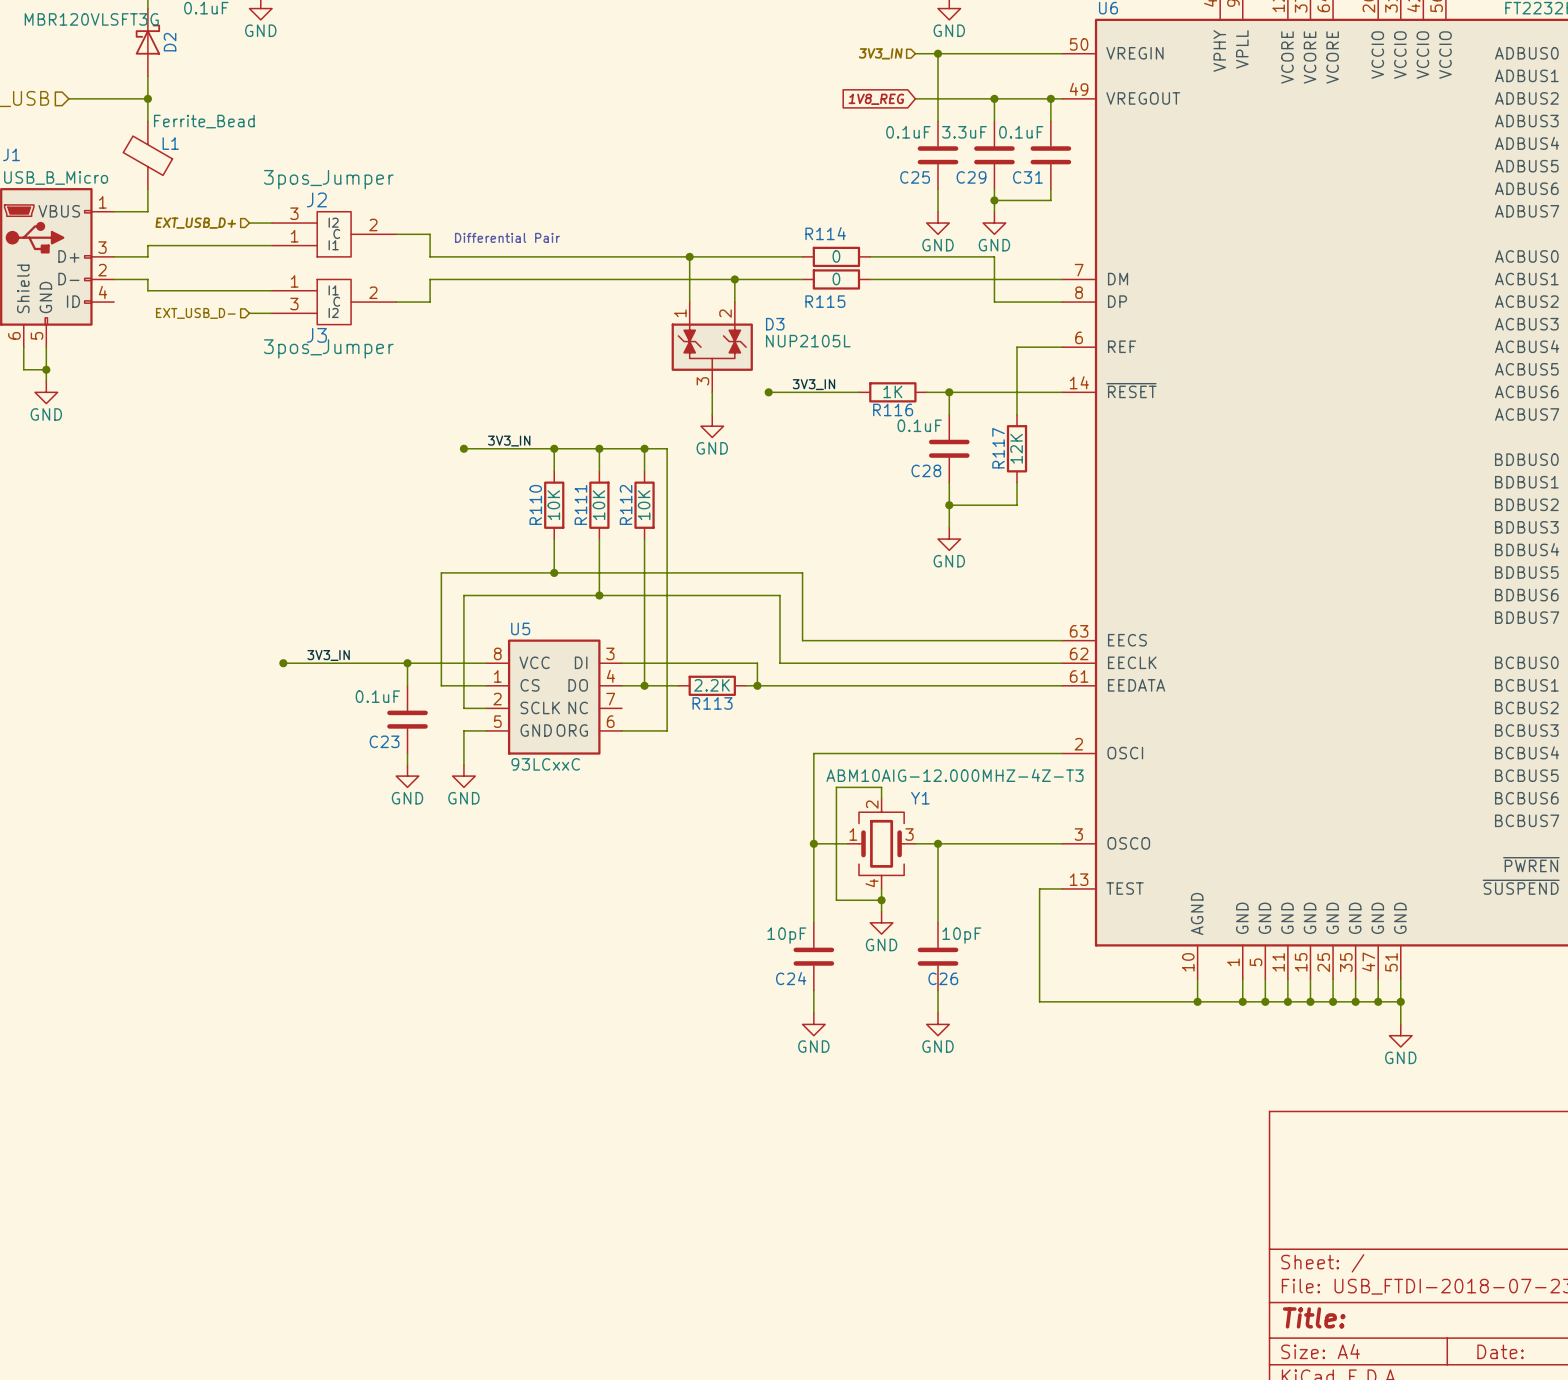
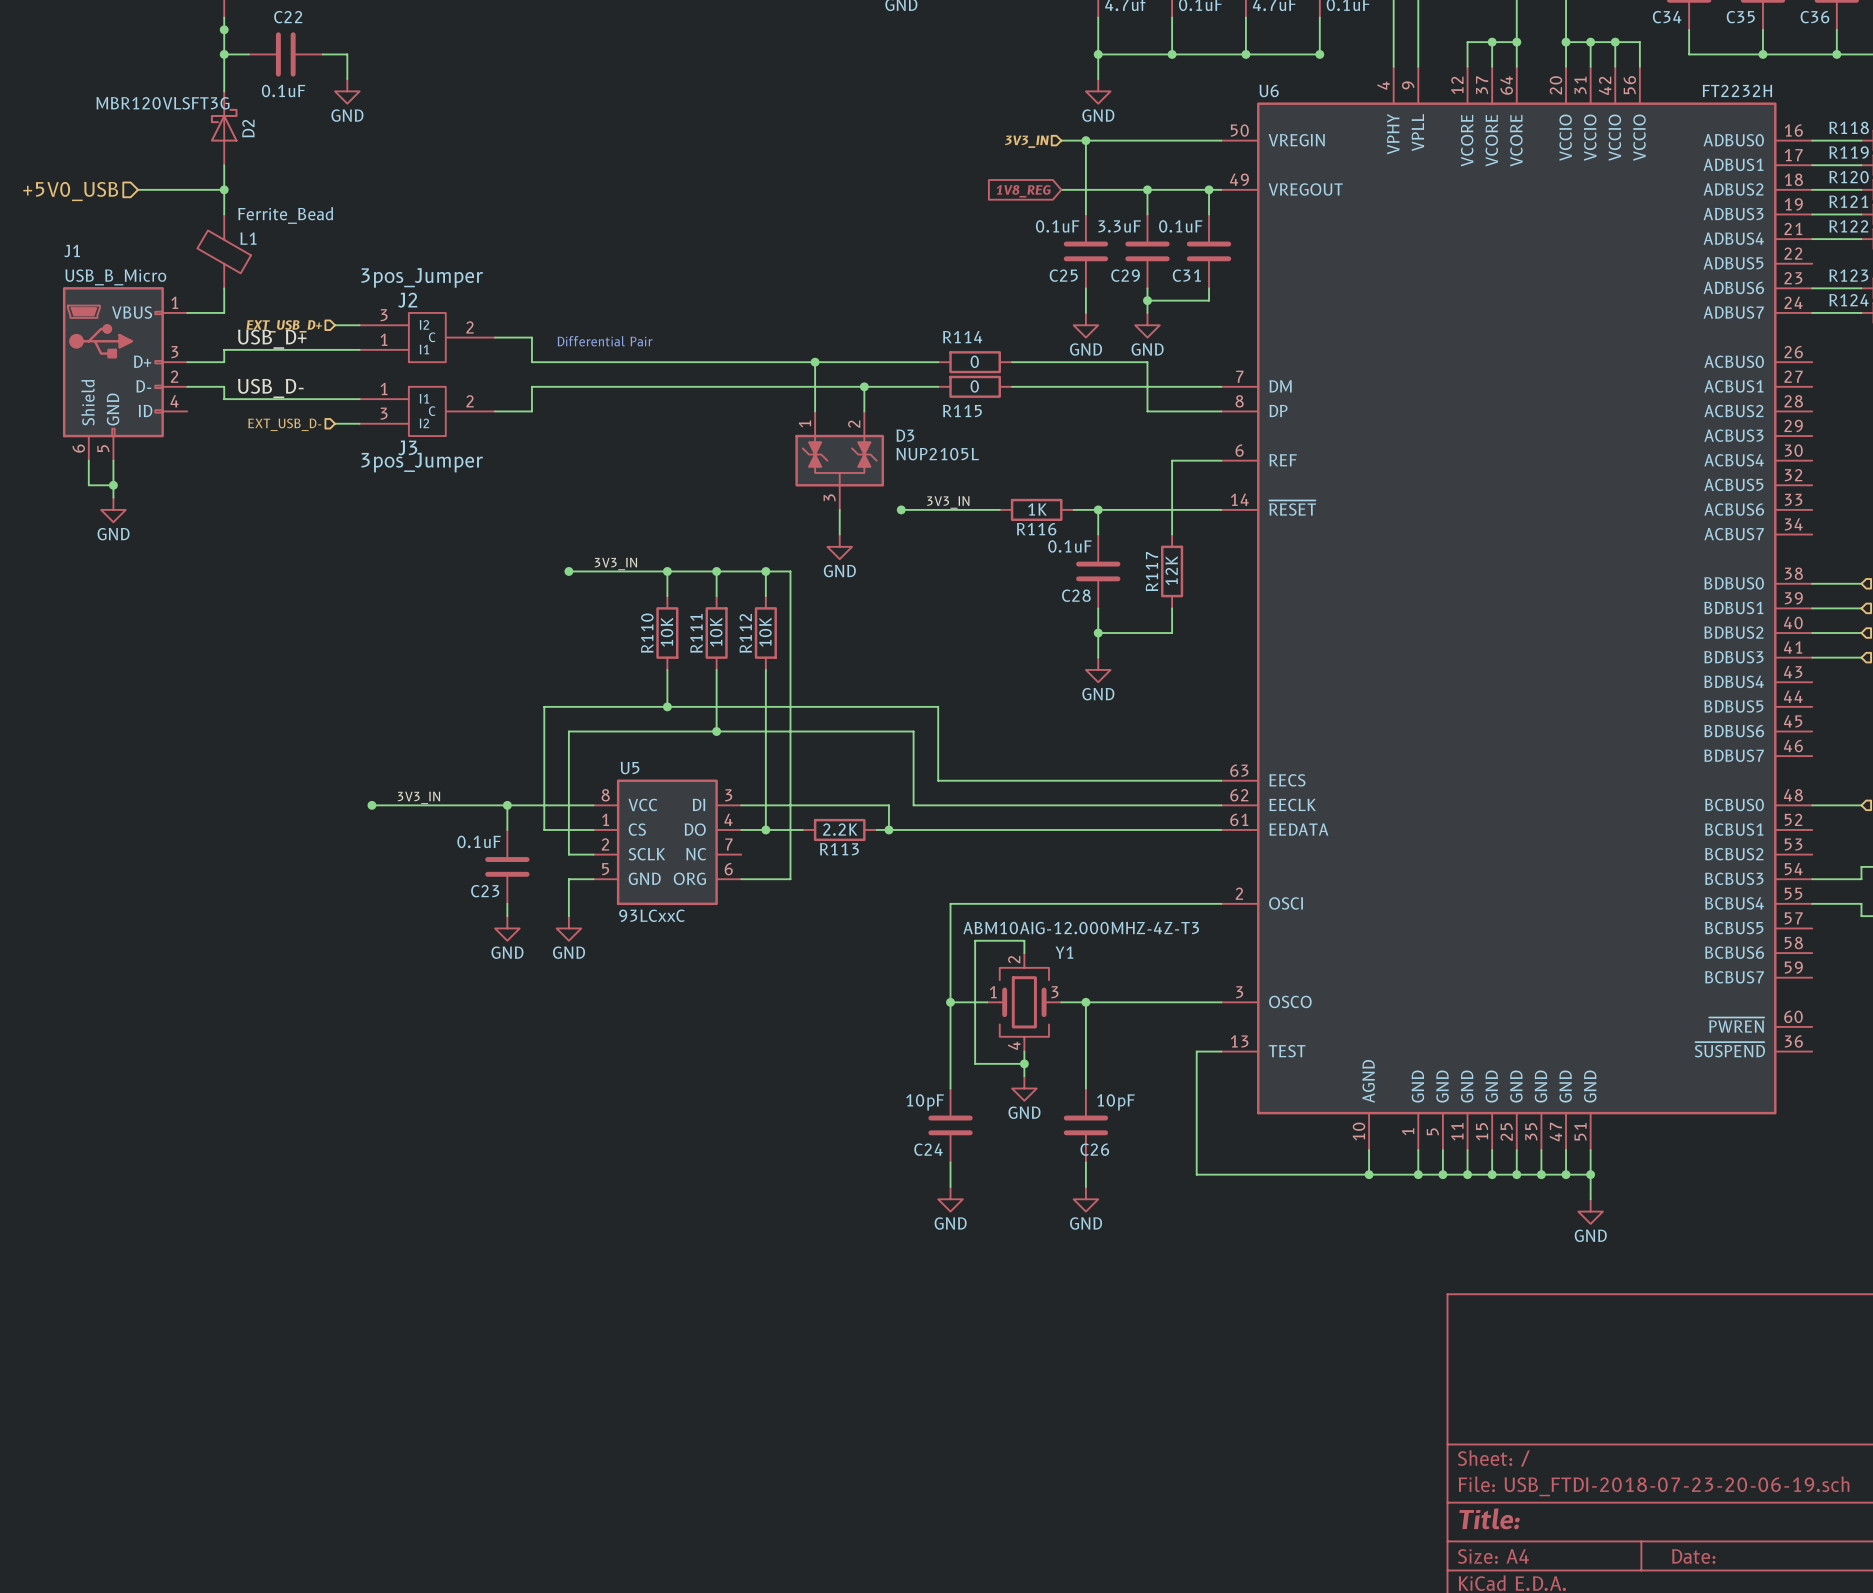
label: none -> USB_D+ (272, 339)
label: none -> USB_D- (270, 388)

